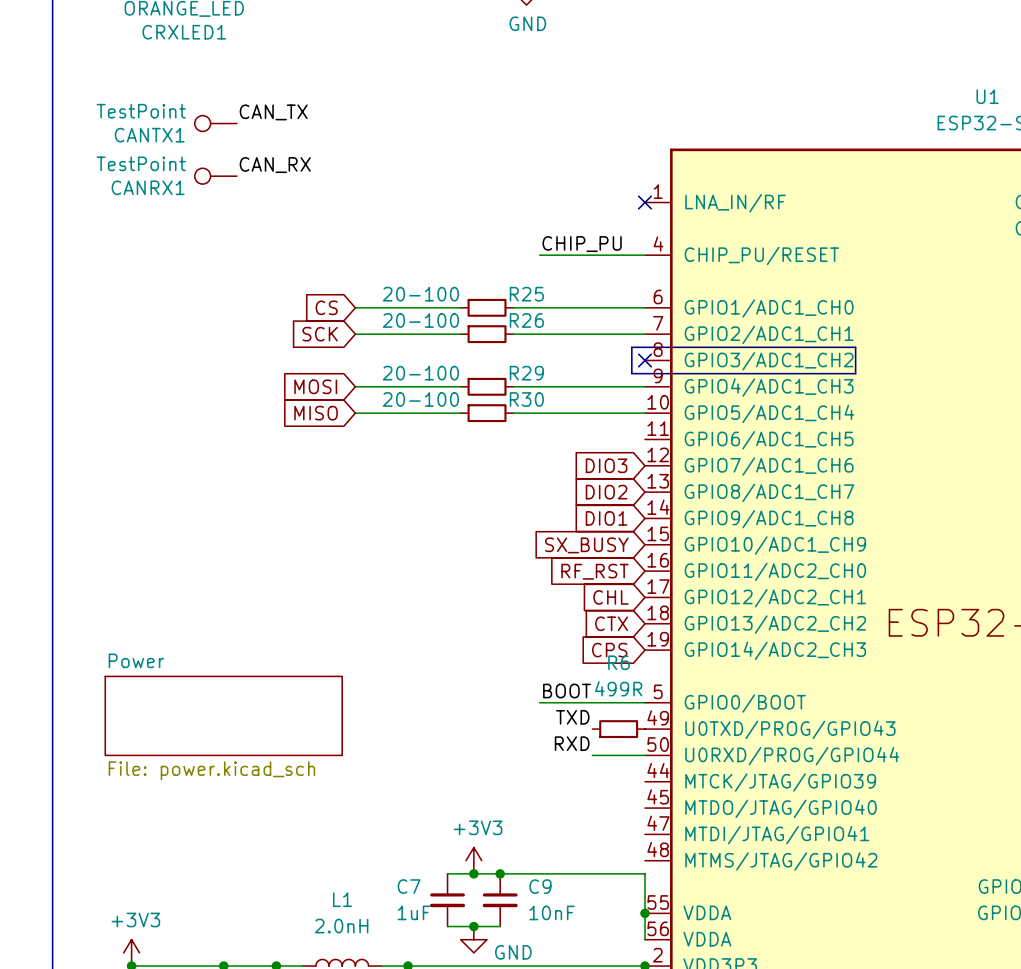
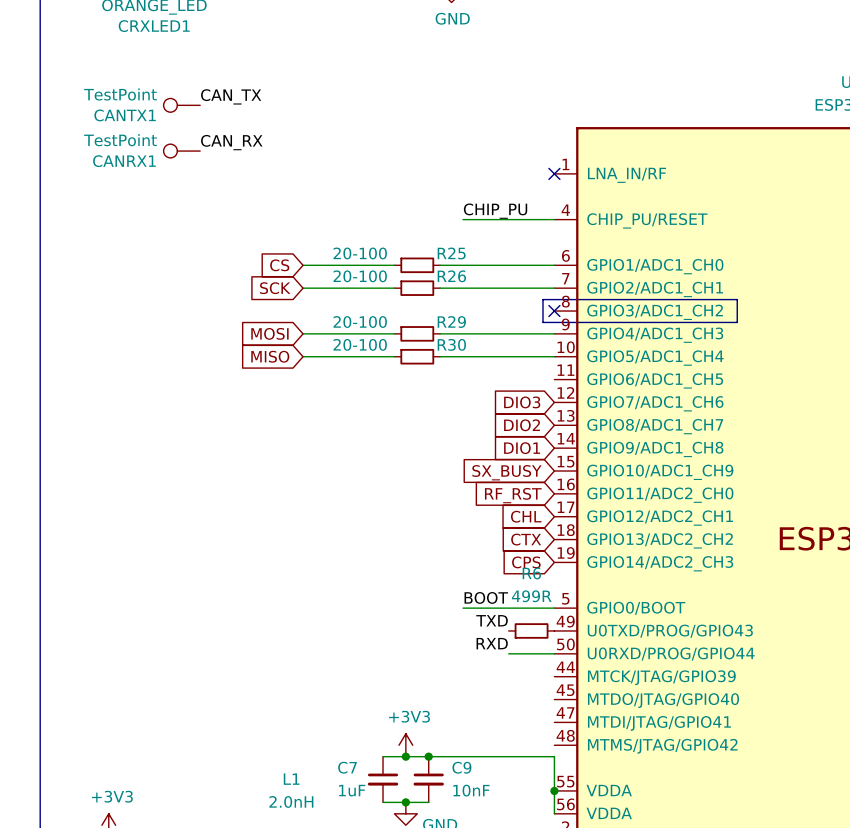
sheet Power: File: power.kicad_sch (223, 715) -> none

